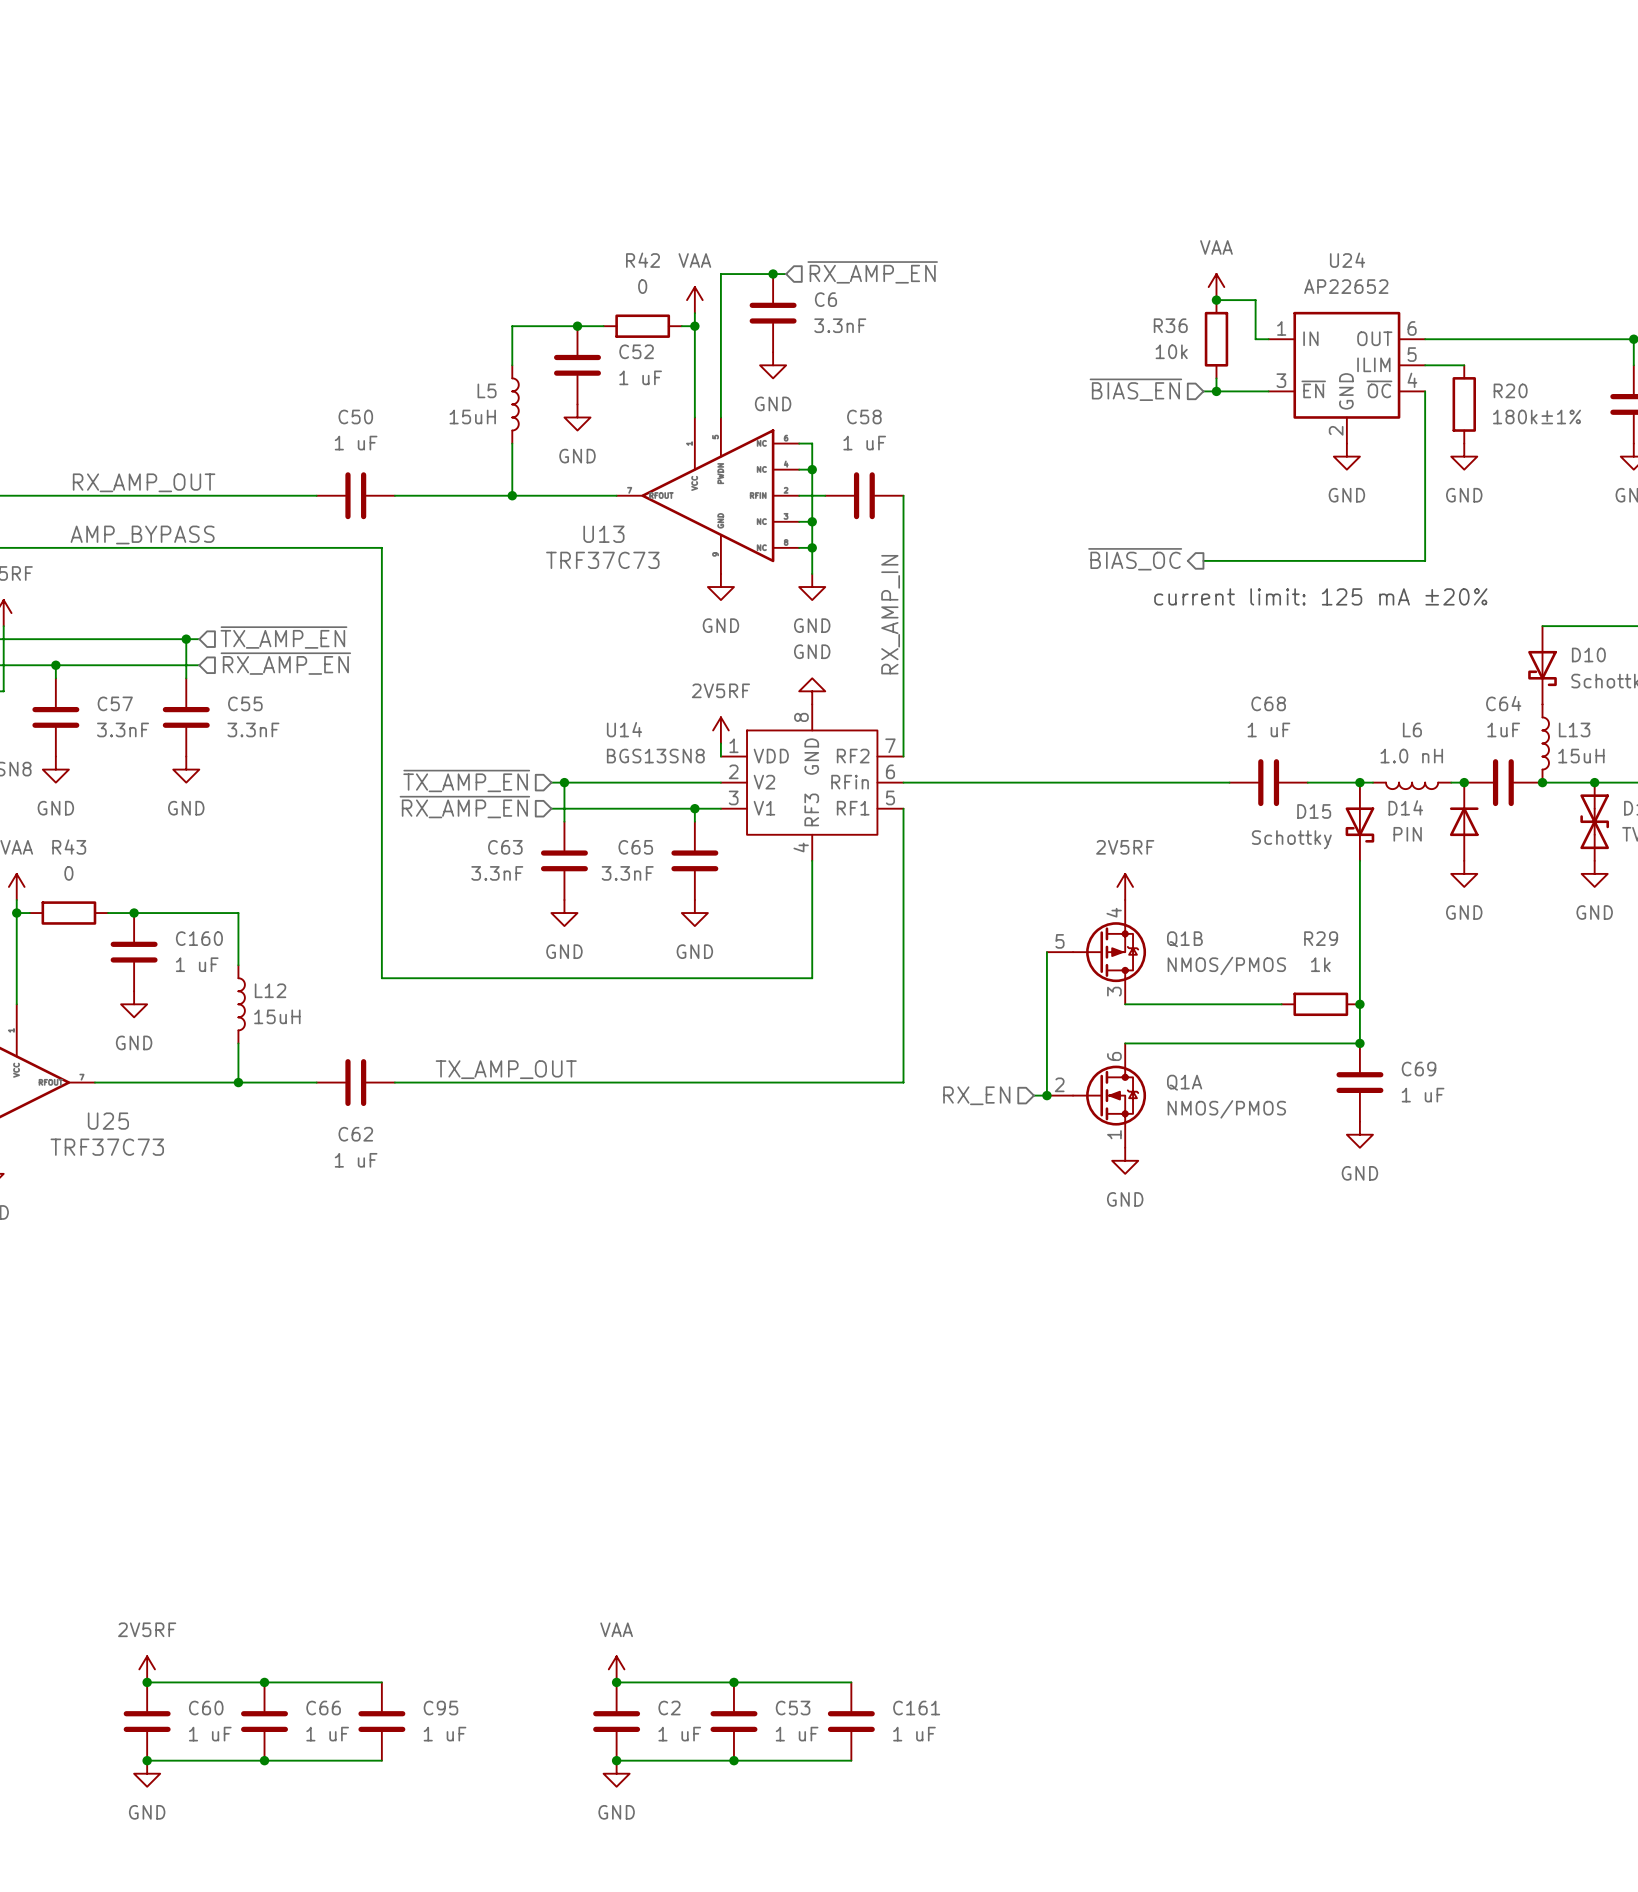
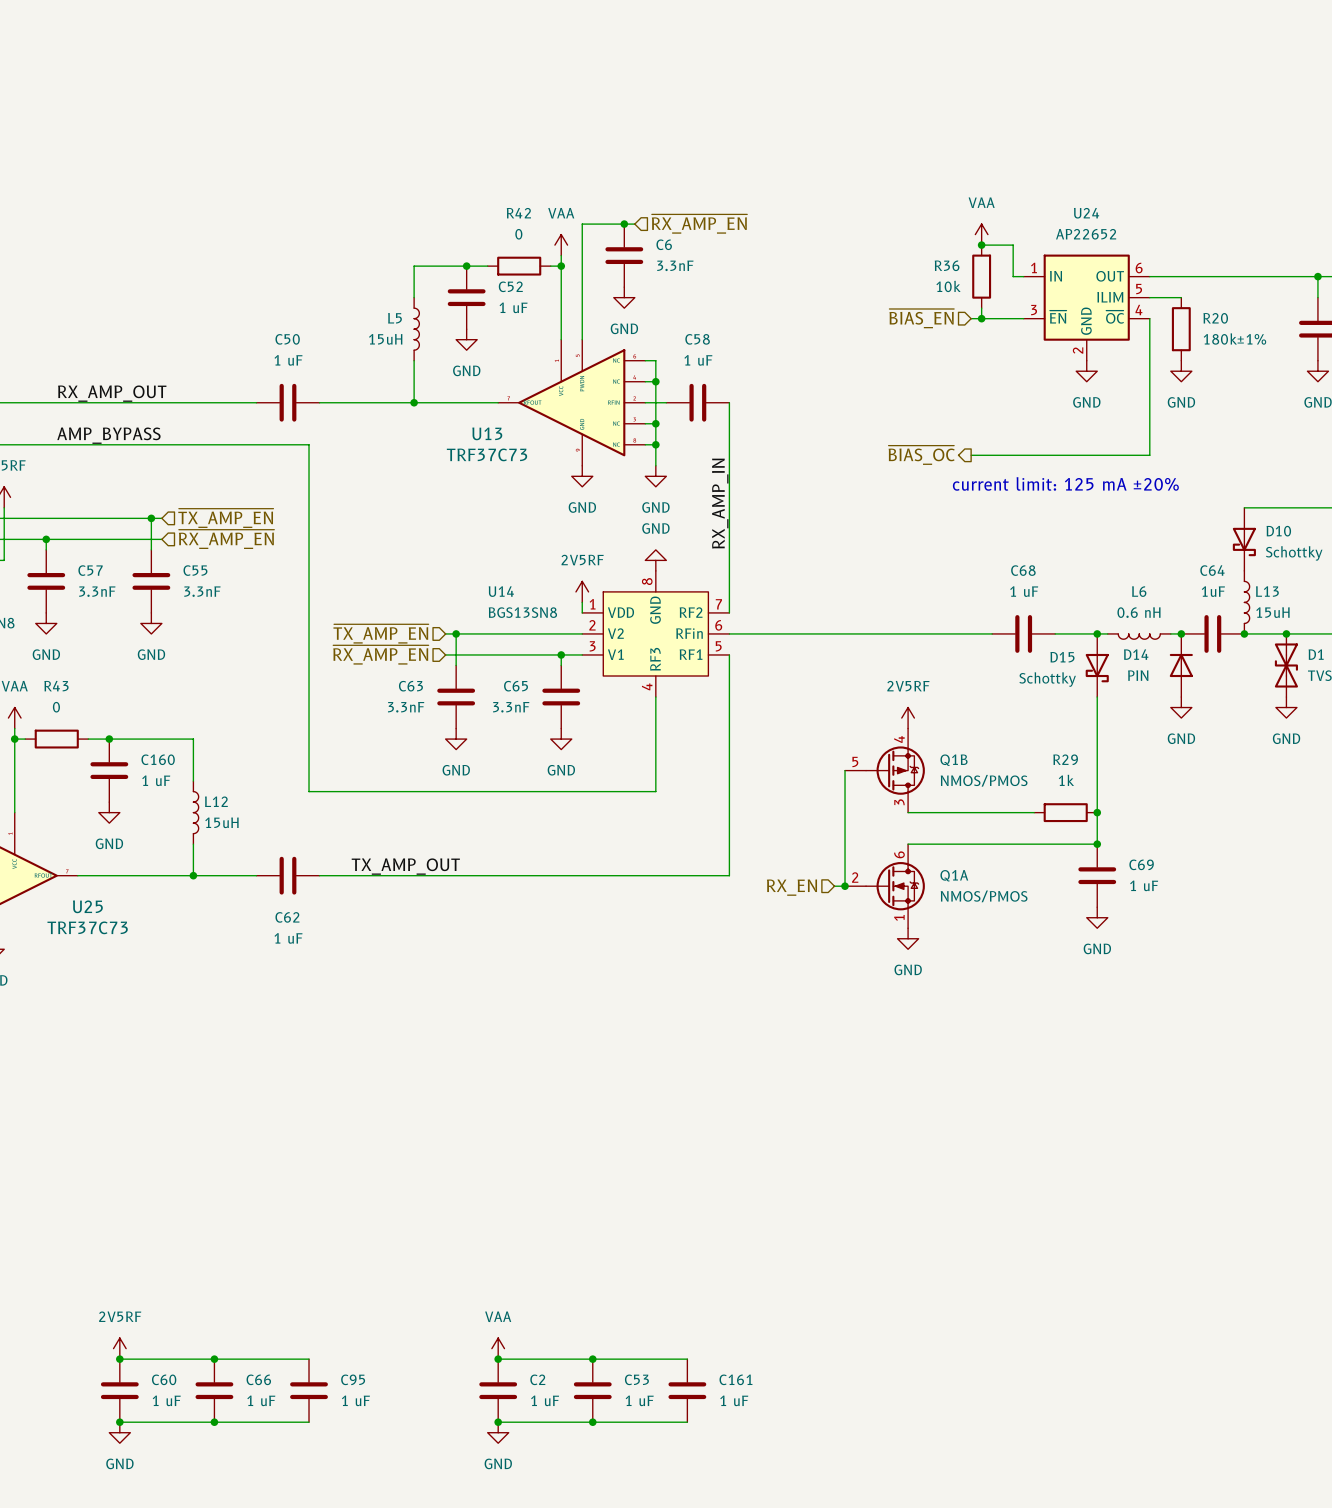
L6 value: 1.0 nH (1411, 756) -> 0.6 nH (1138, 612)

